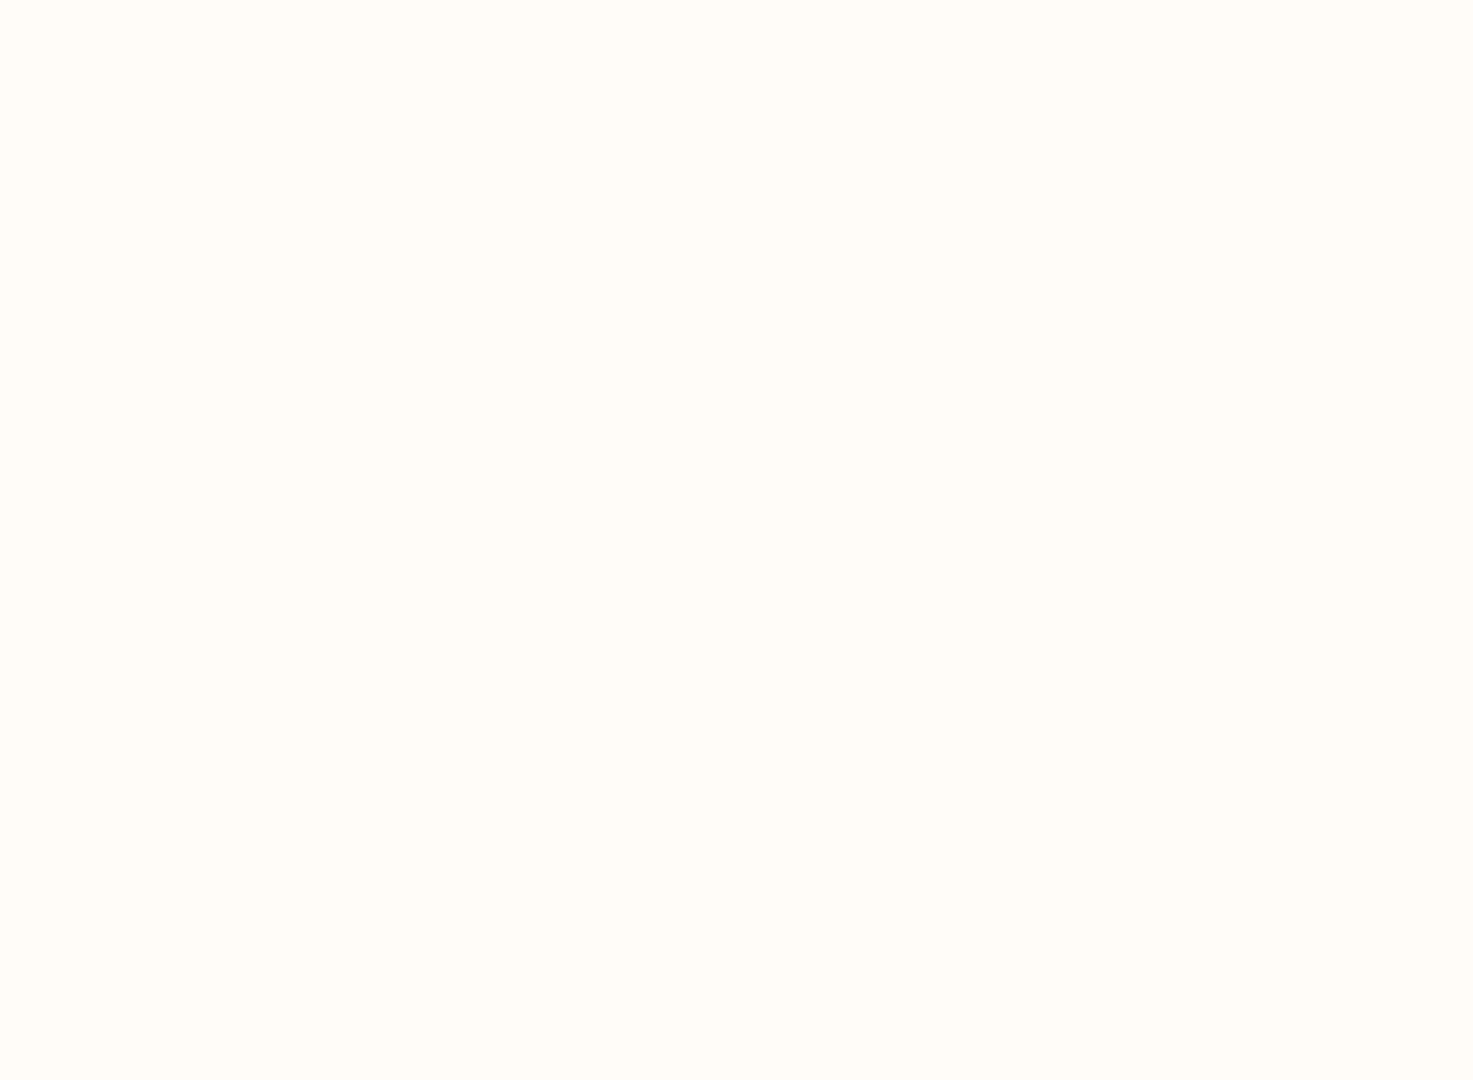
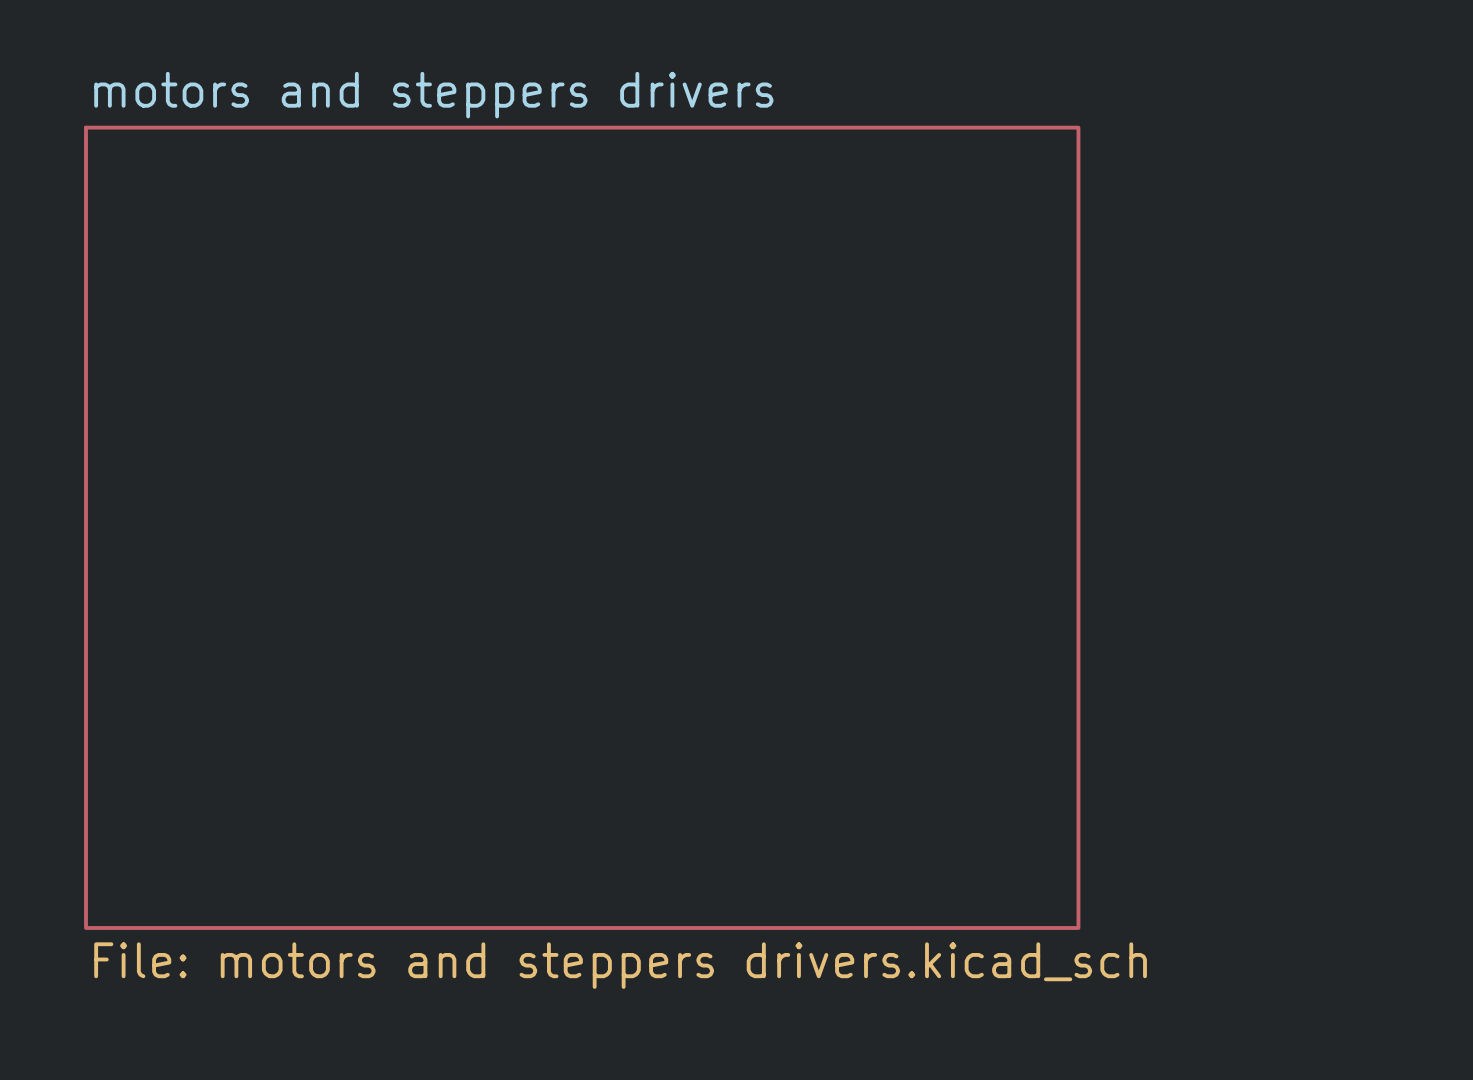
sheet motors and steppers drivers: none -> File: motors and steppers drivers.kicad_sch (582, 527)

